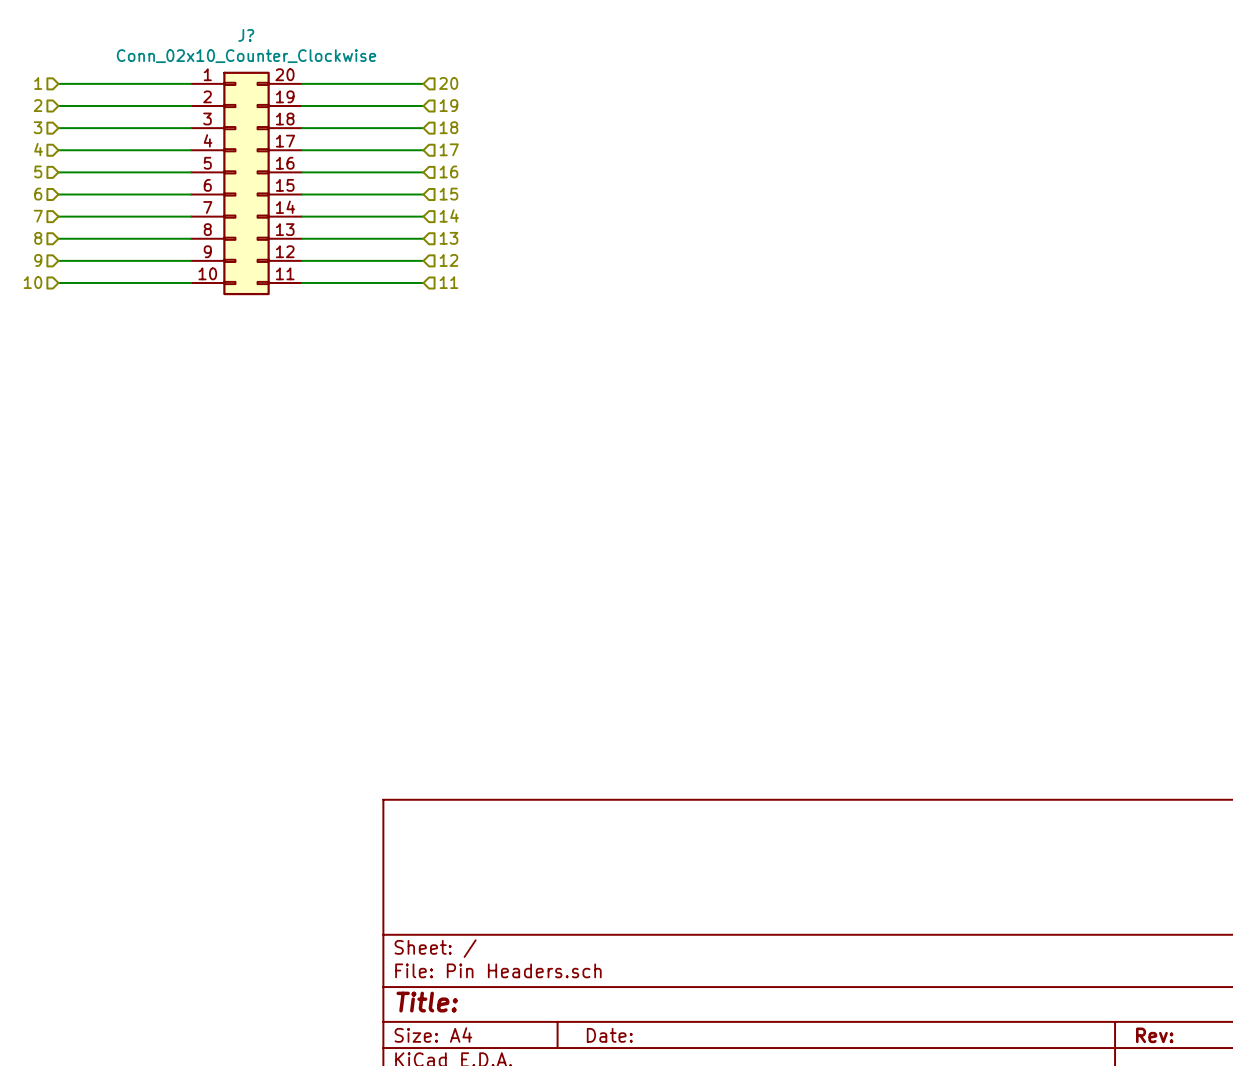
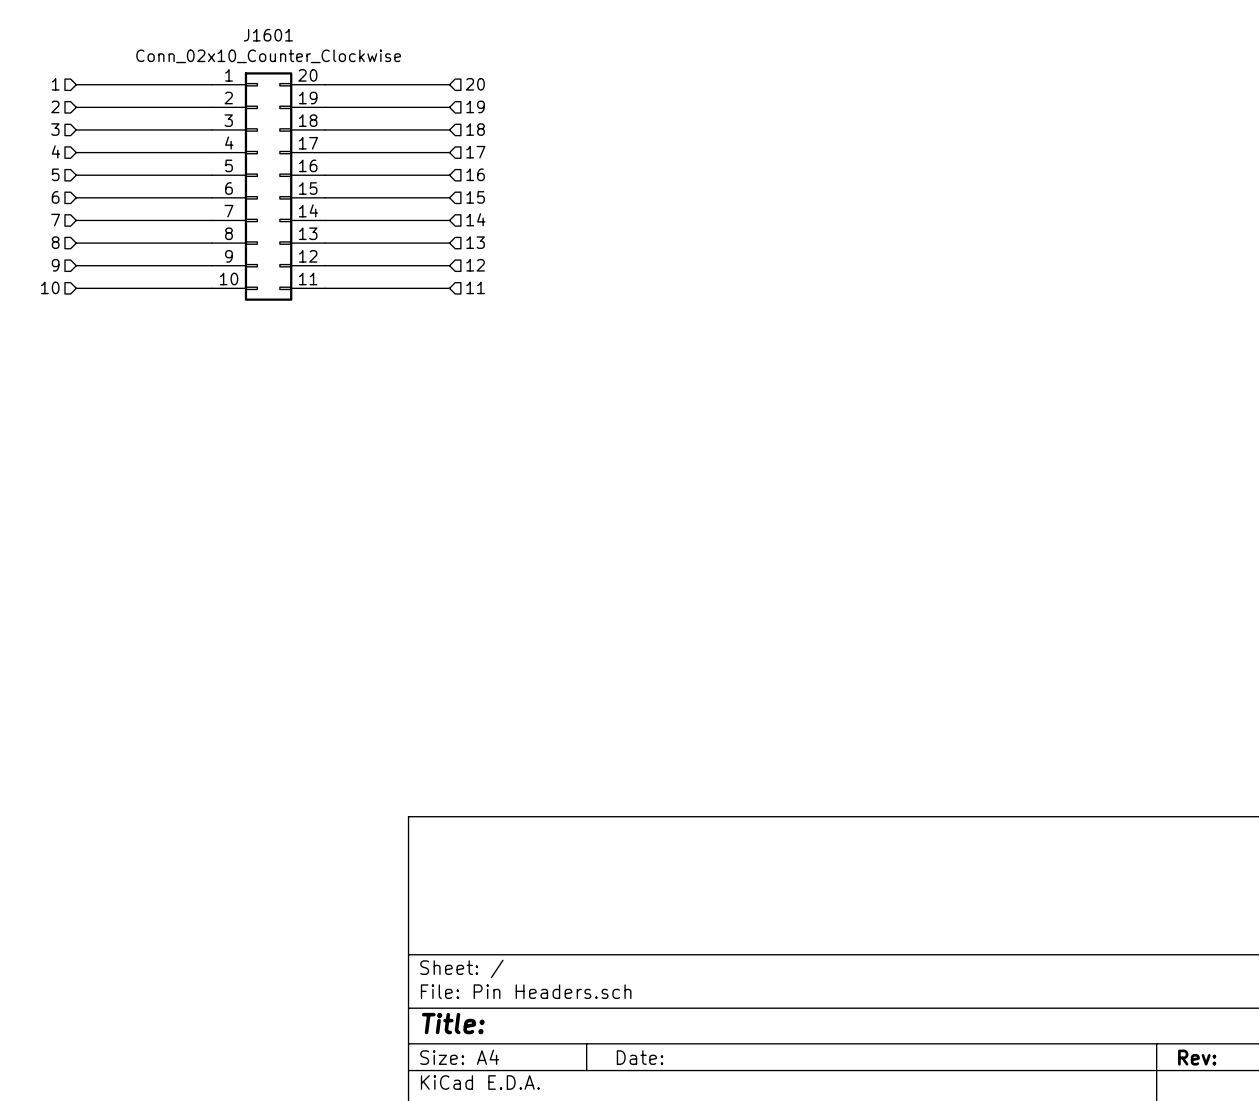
J? name: J? (246, 35) -> J1601 (268, 35)

